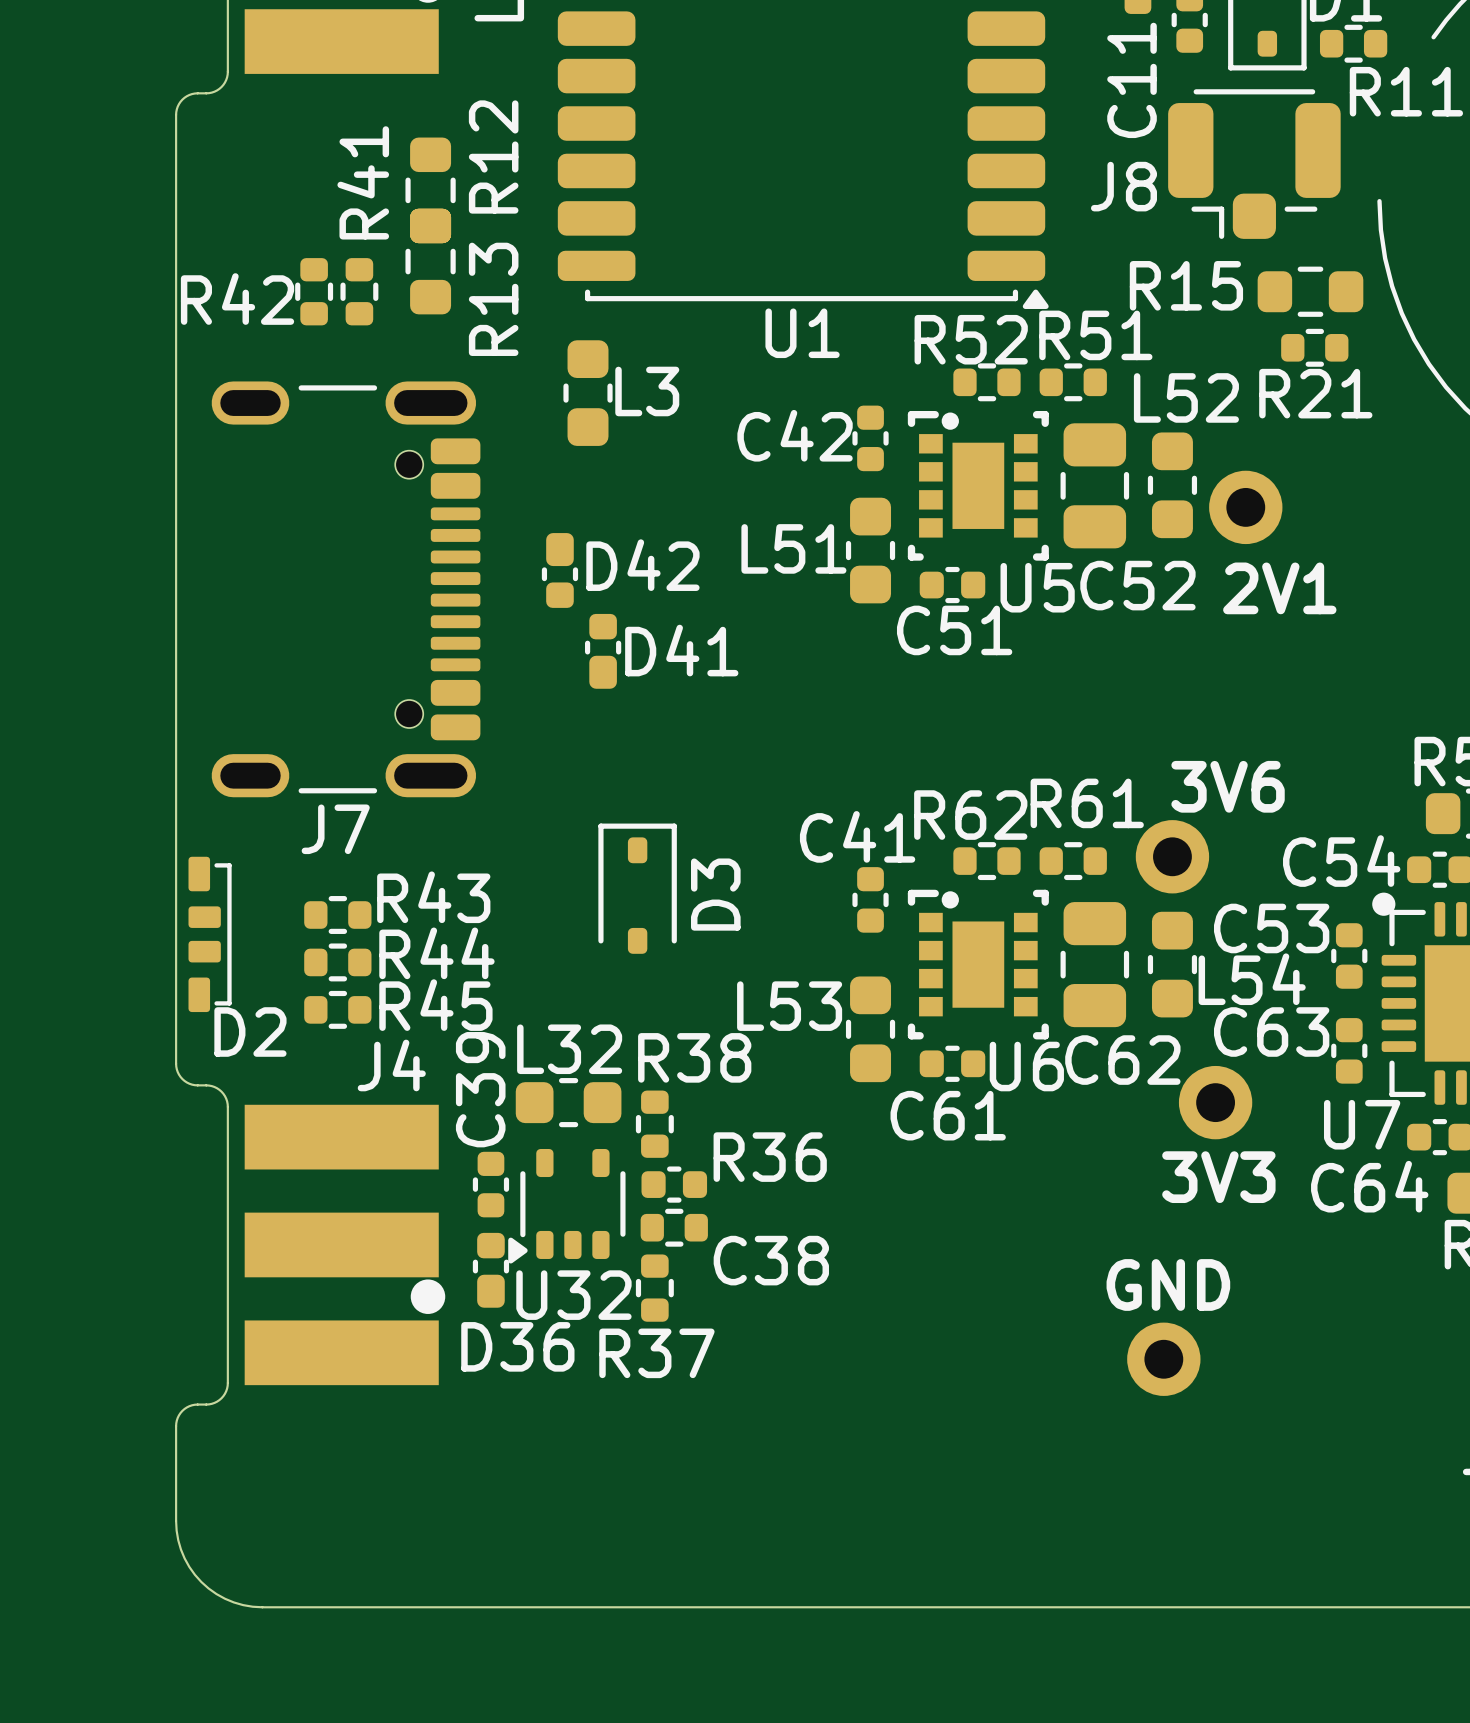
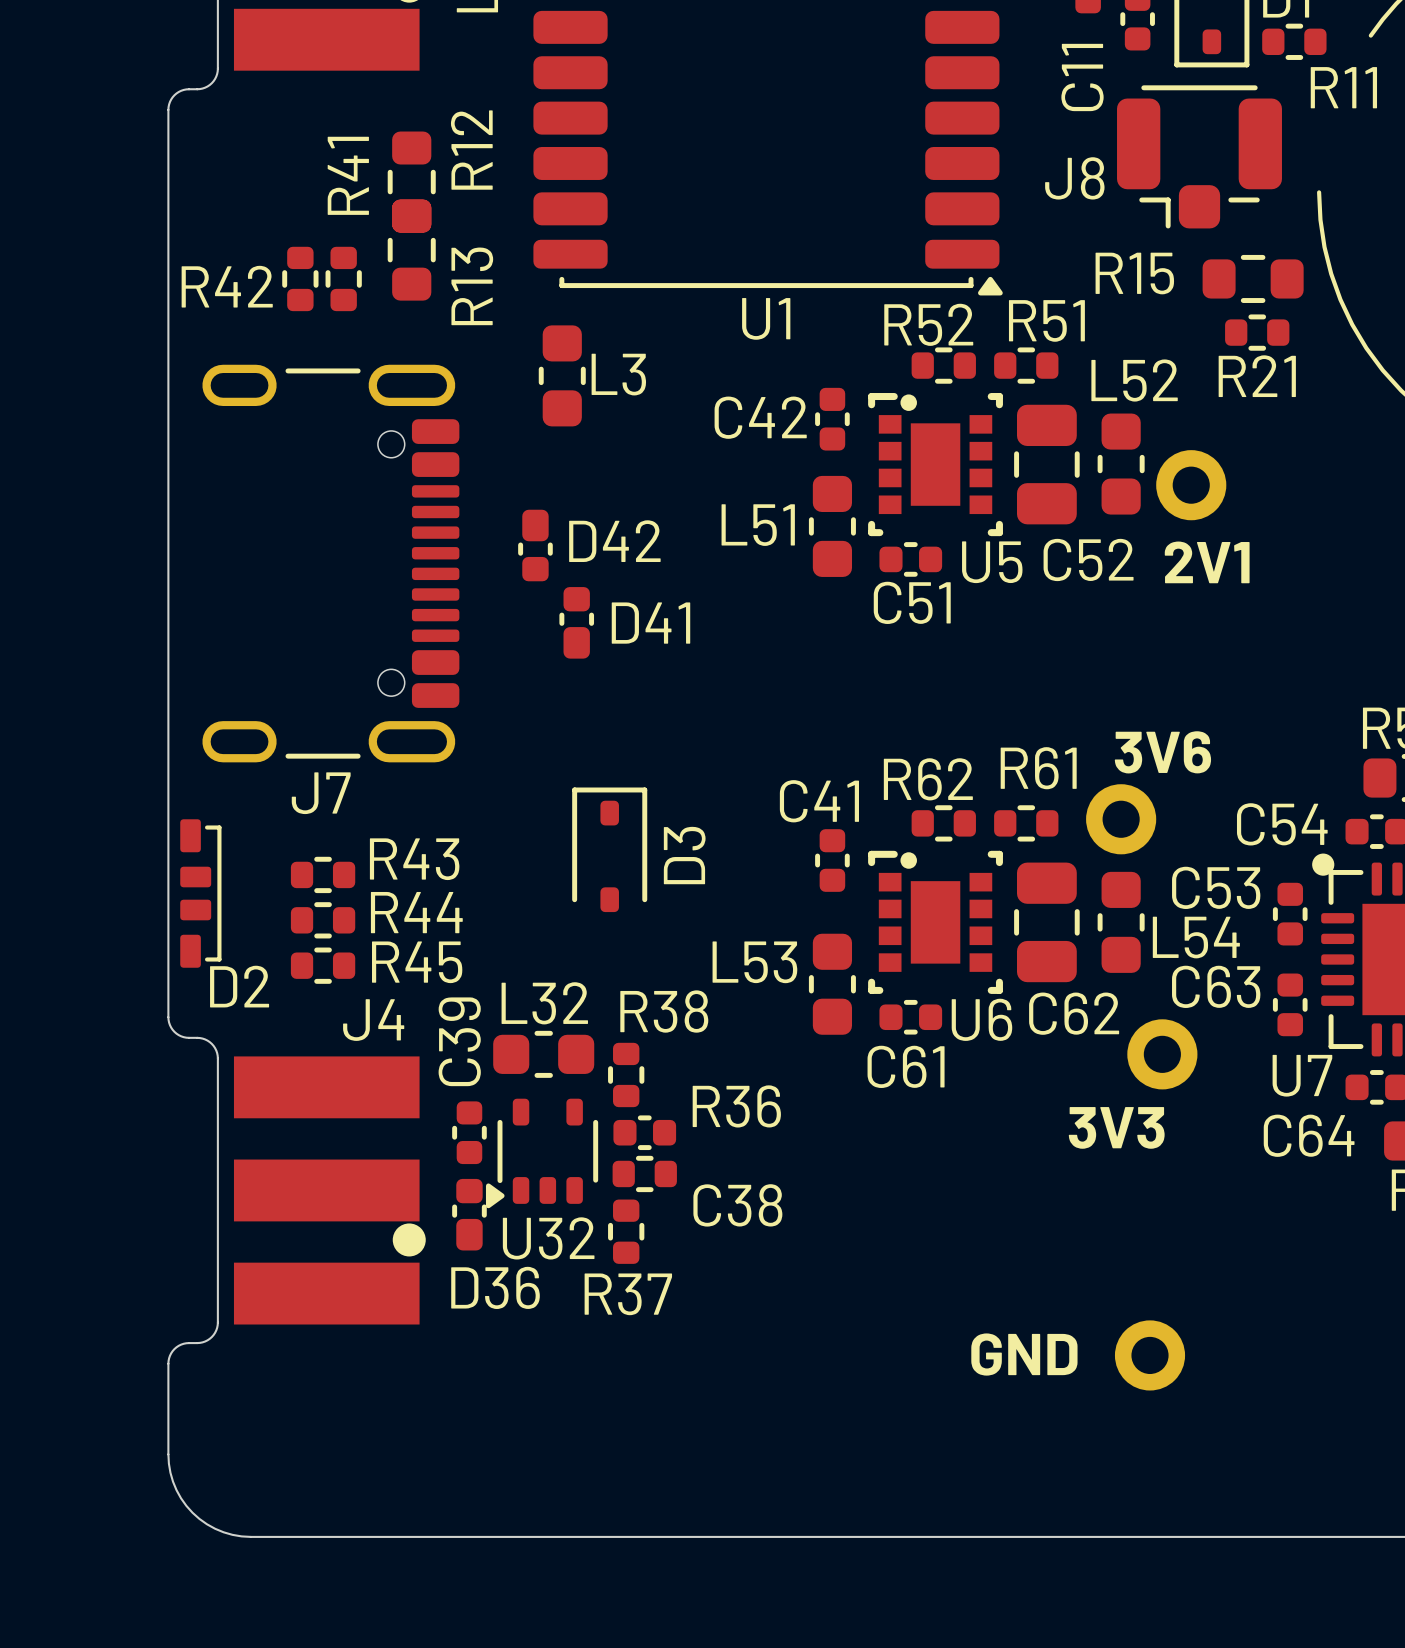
text position: 3V3 (1218, 1177) -> 3V3 (1116, 1127)
text position: GND (1168, 1284) -> GND (1024, 1354)
part position: (1163, 1359) -> (1150, 1355)

